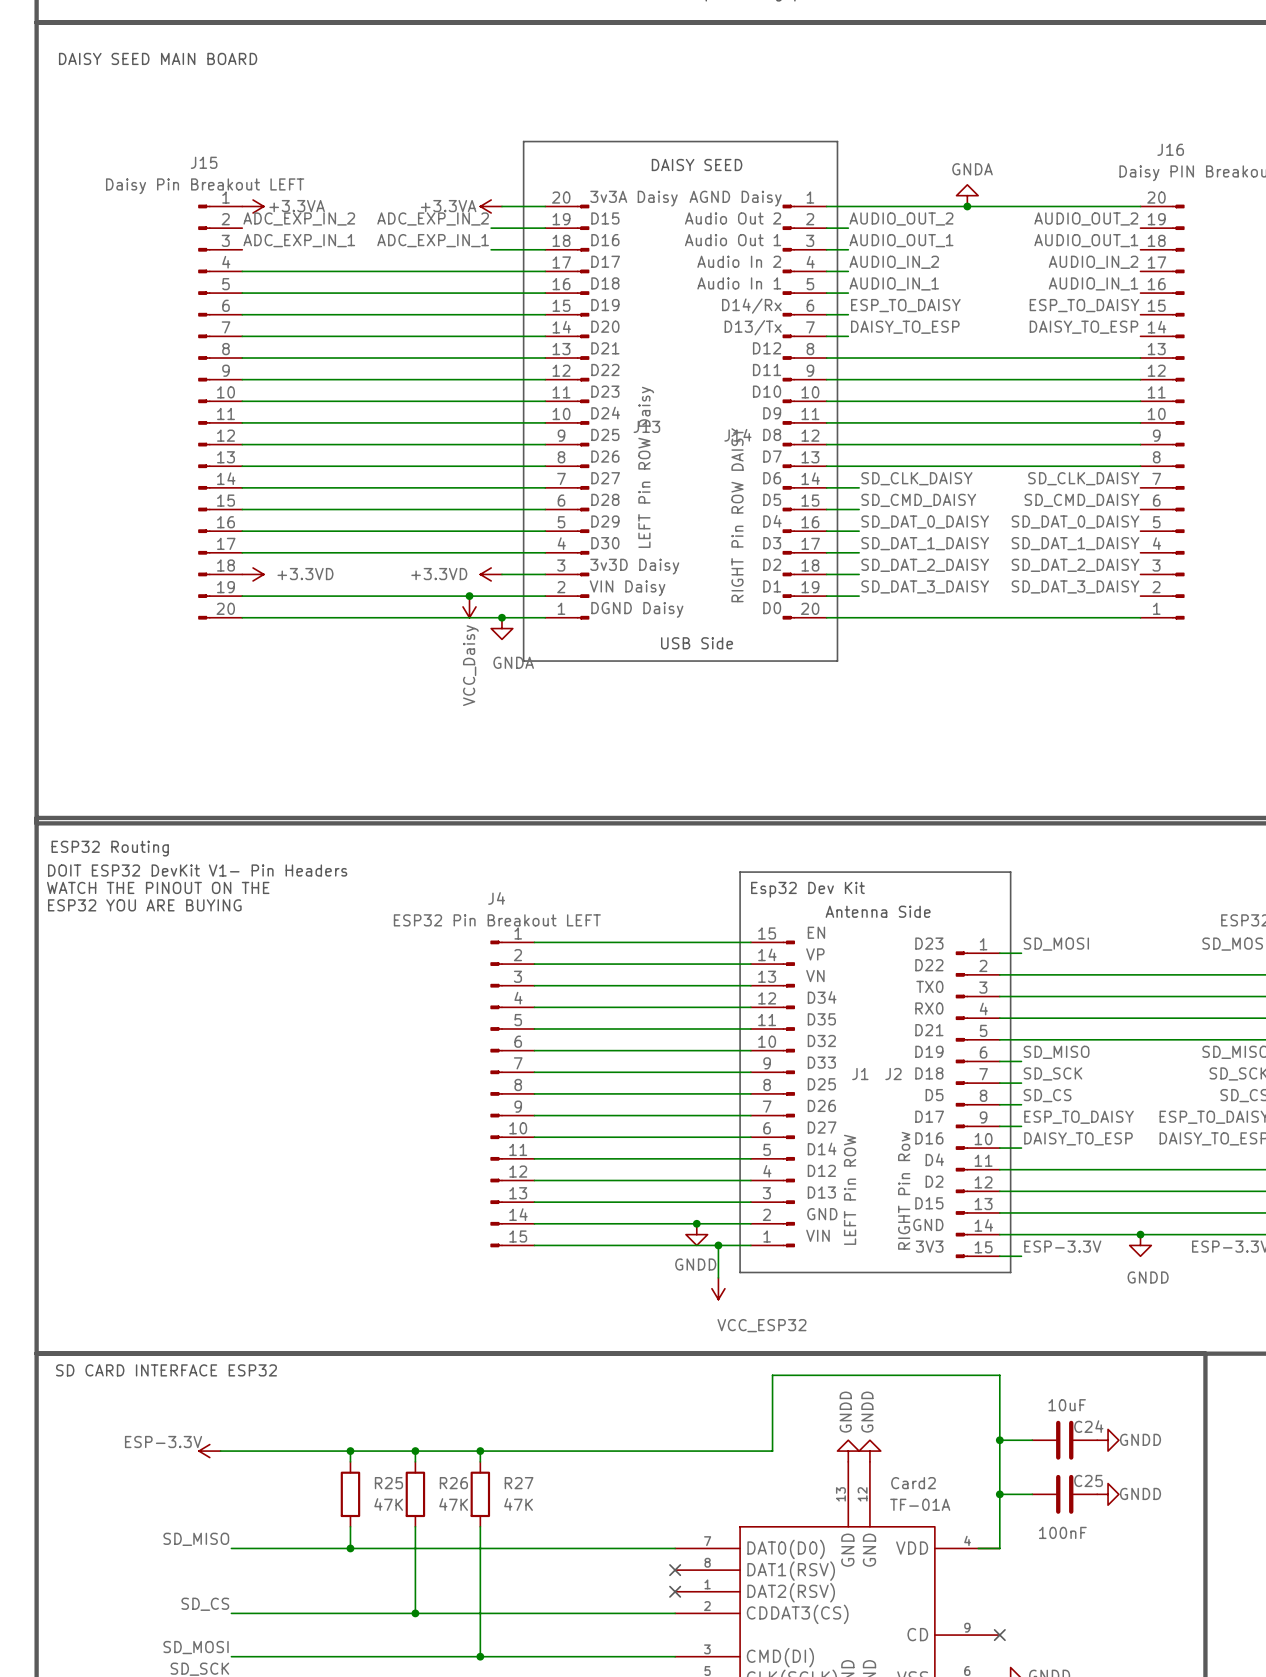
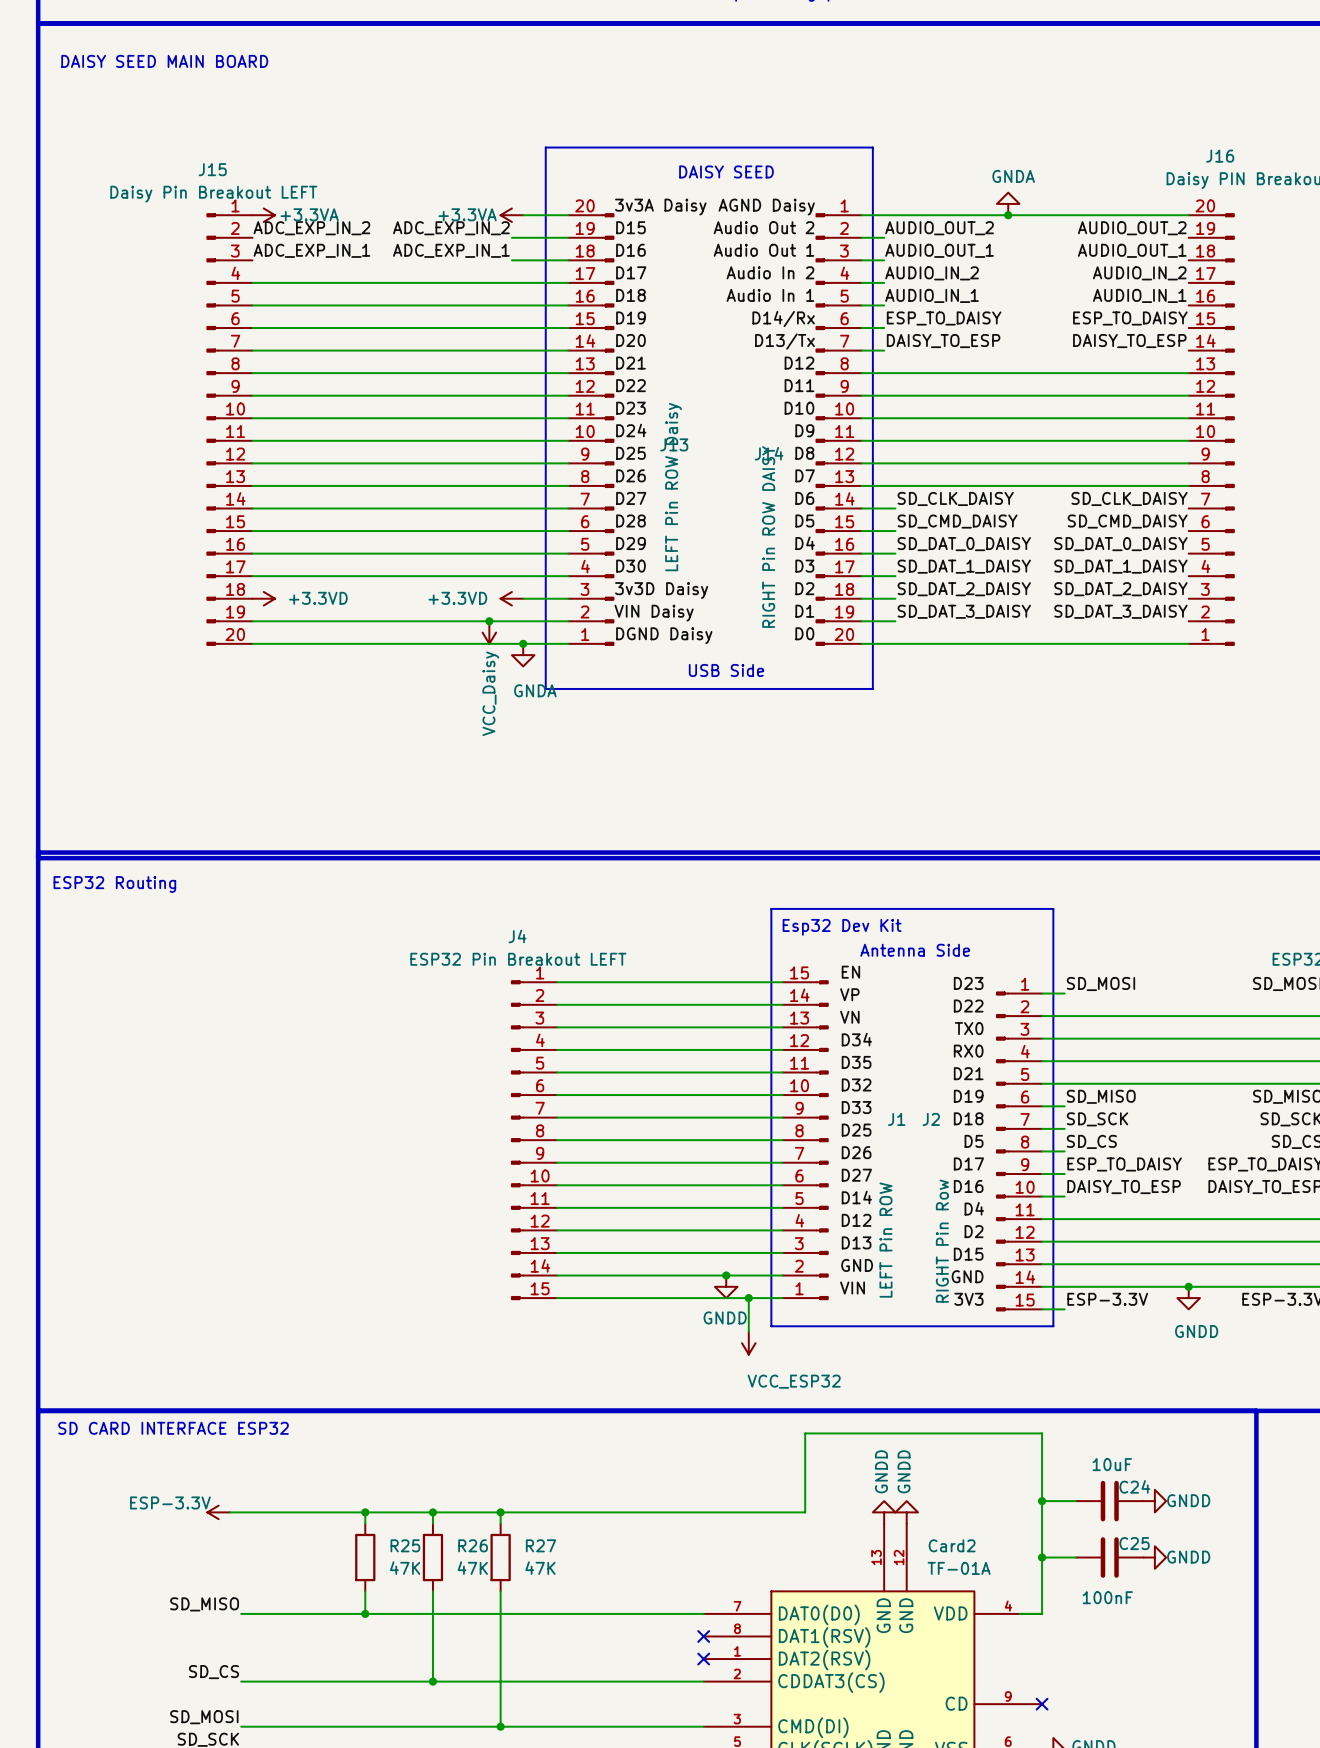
text: DOIT ESP32 DevKit V1- Pin Headers (197, 870) -> none
text: WATCH THE PINOUT ON THE (158, 887) -> none
text: ESP32 YOU ARE BUYING (144, 905) -> none

